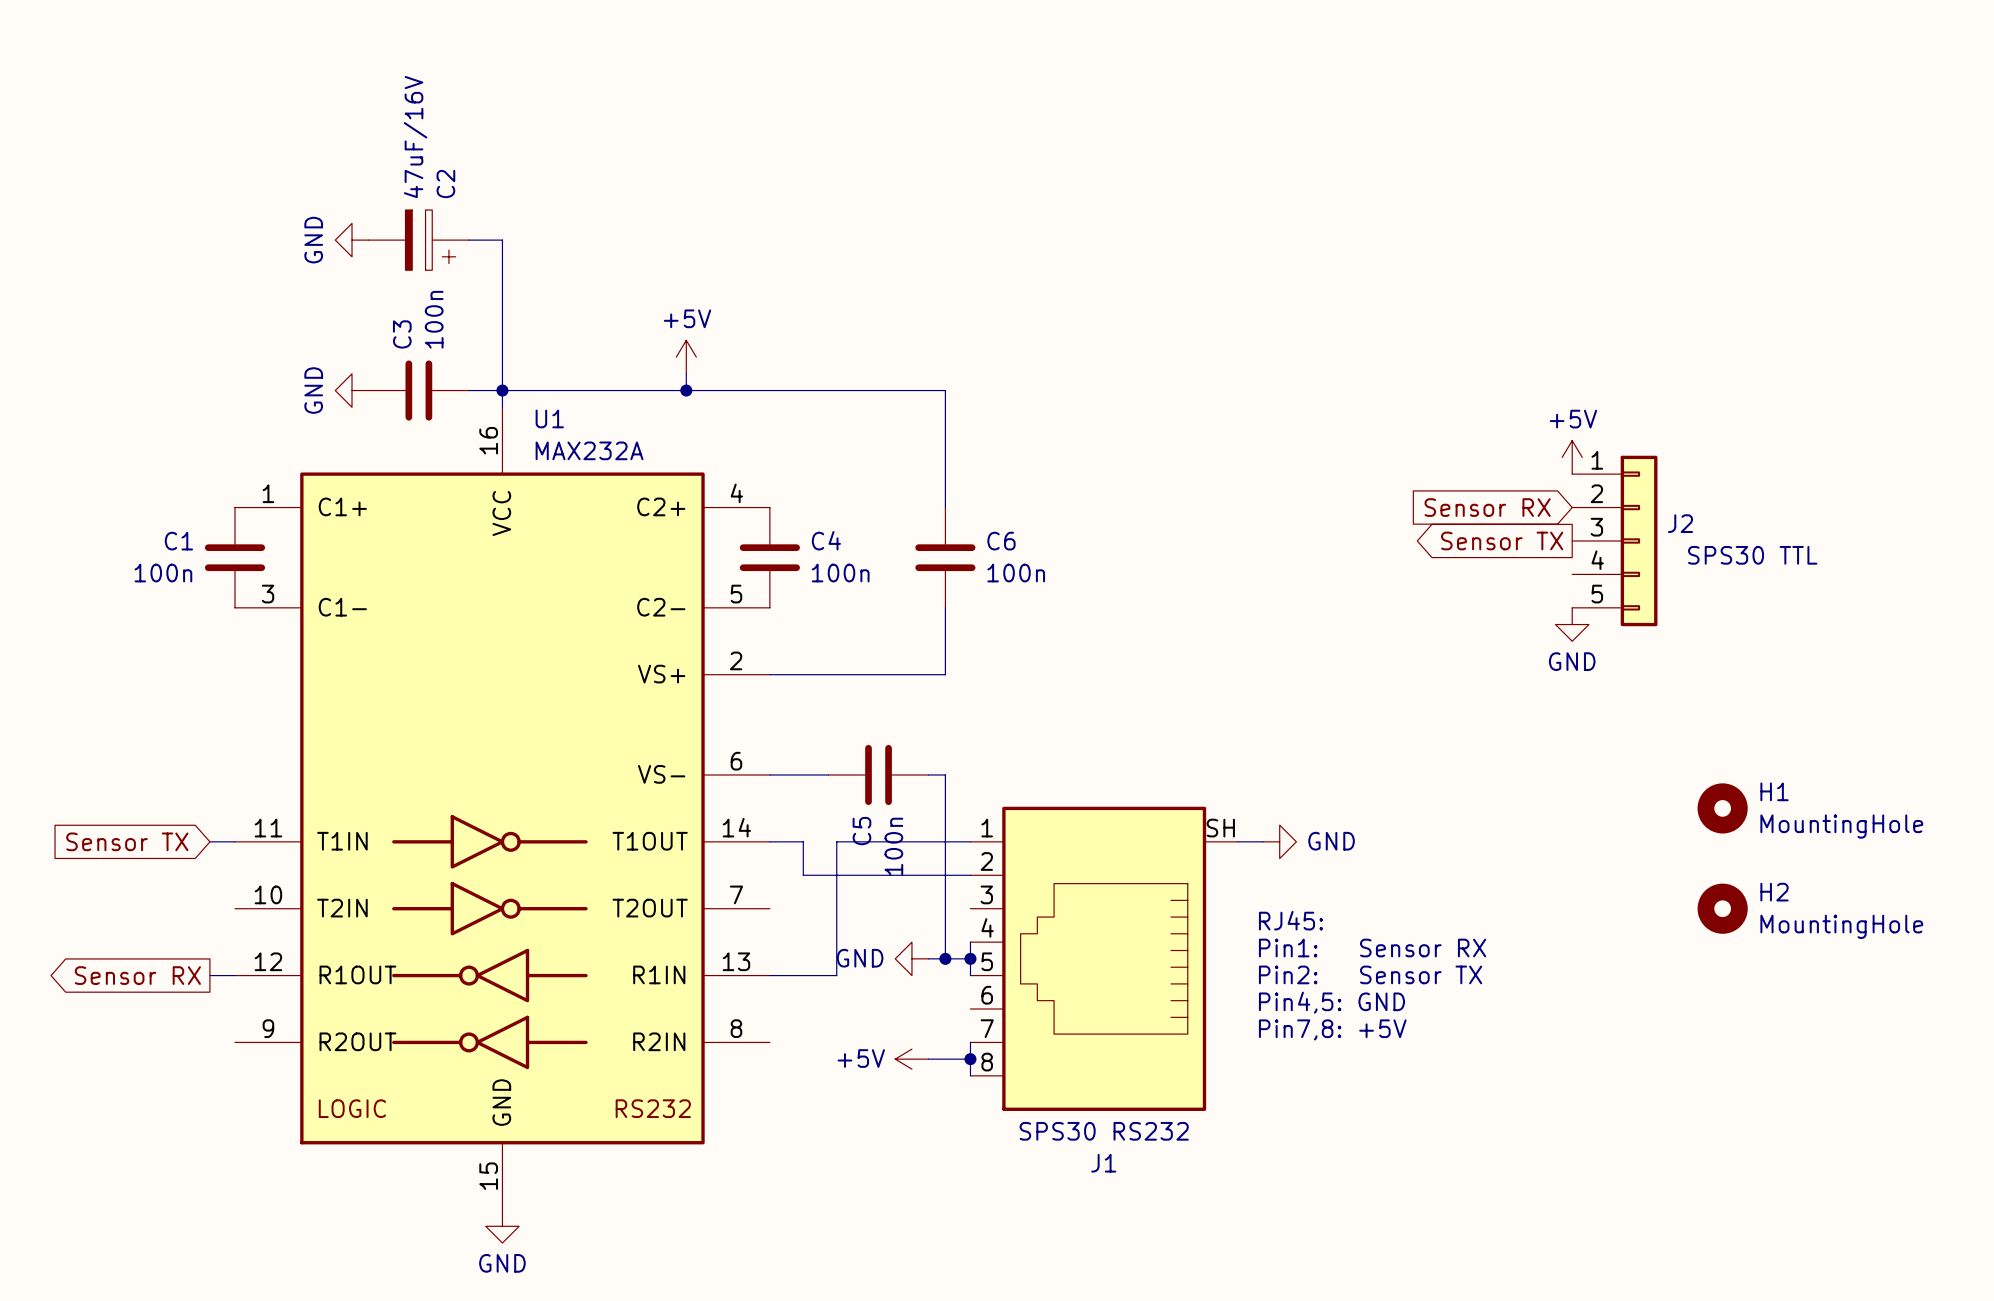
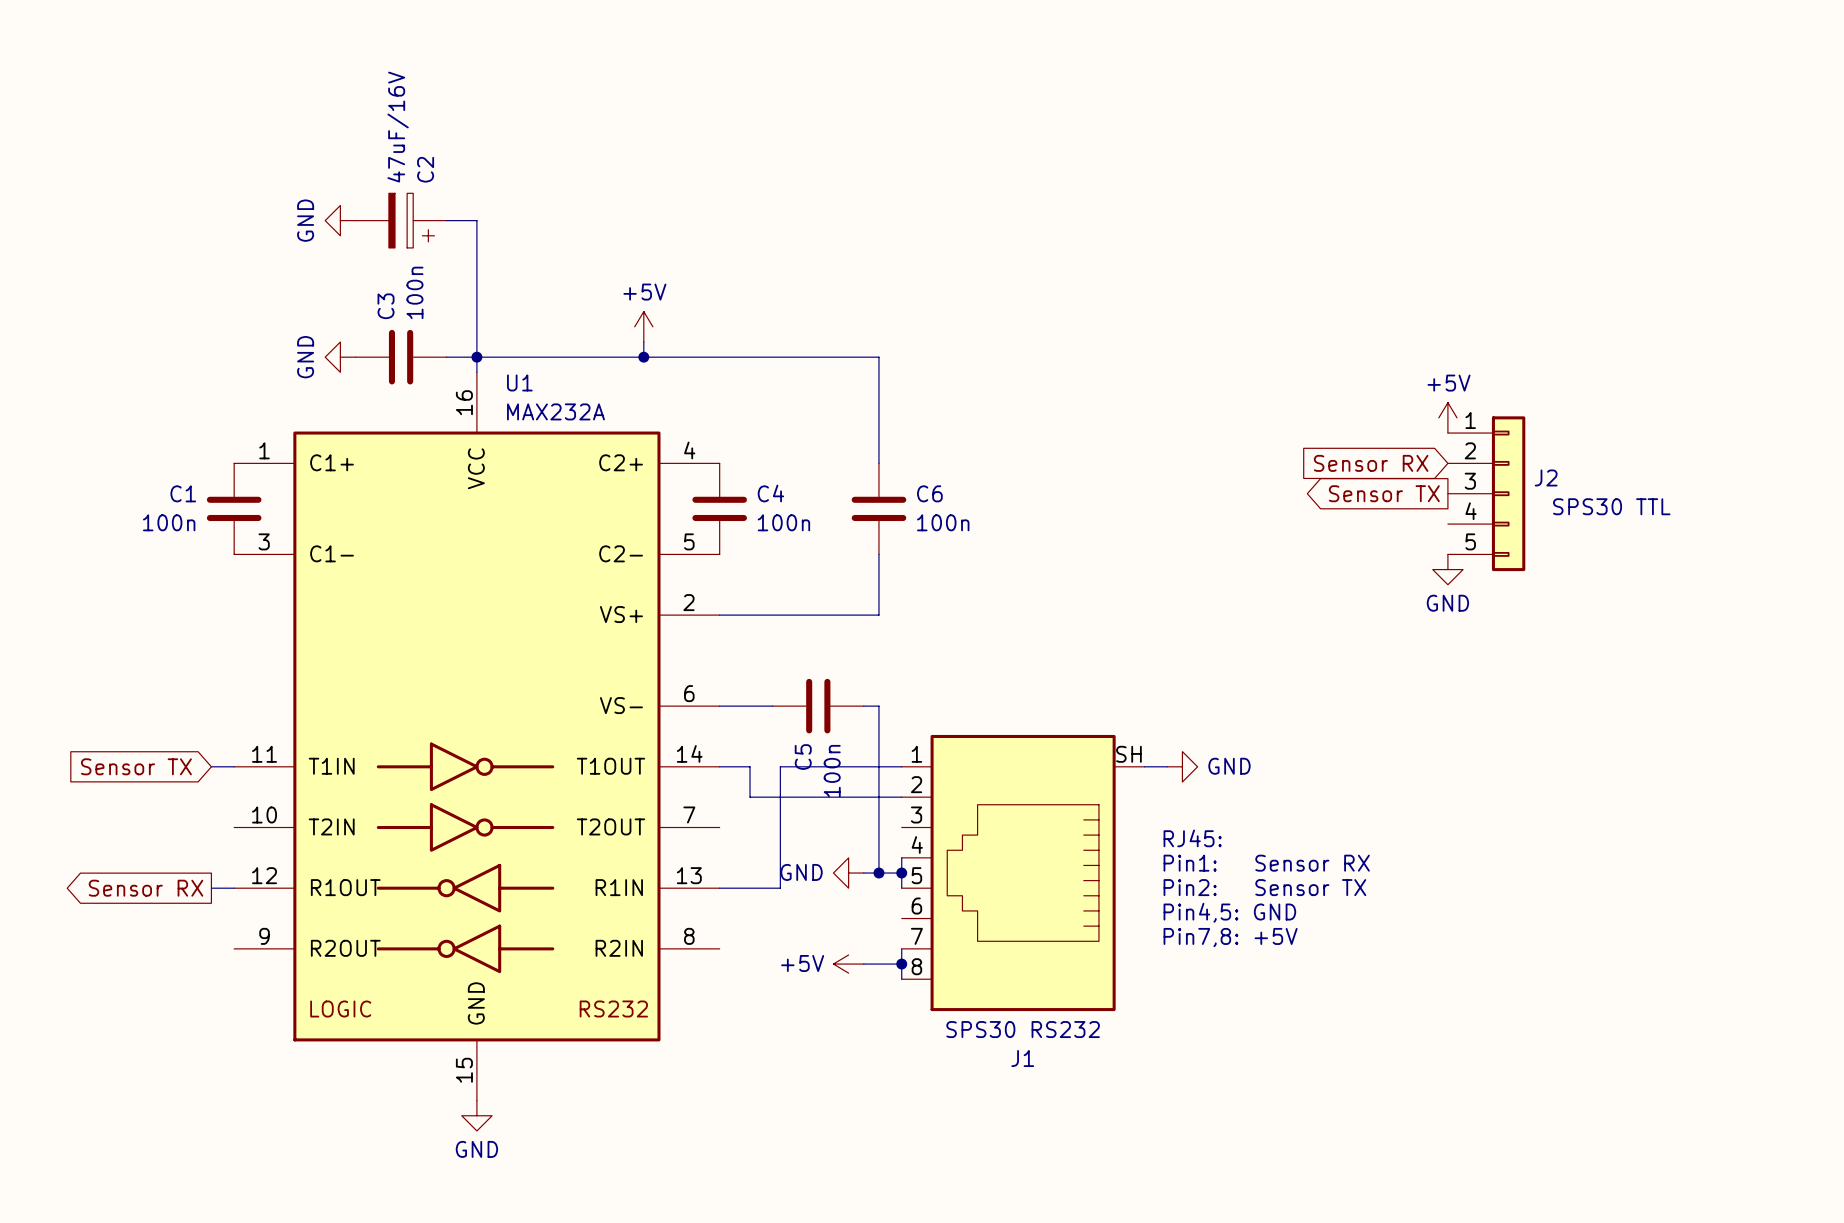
H1: MountingHole (1722, 808) -> none
H2: MountingHole (1722, 908) -> none

